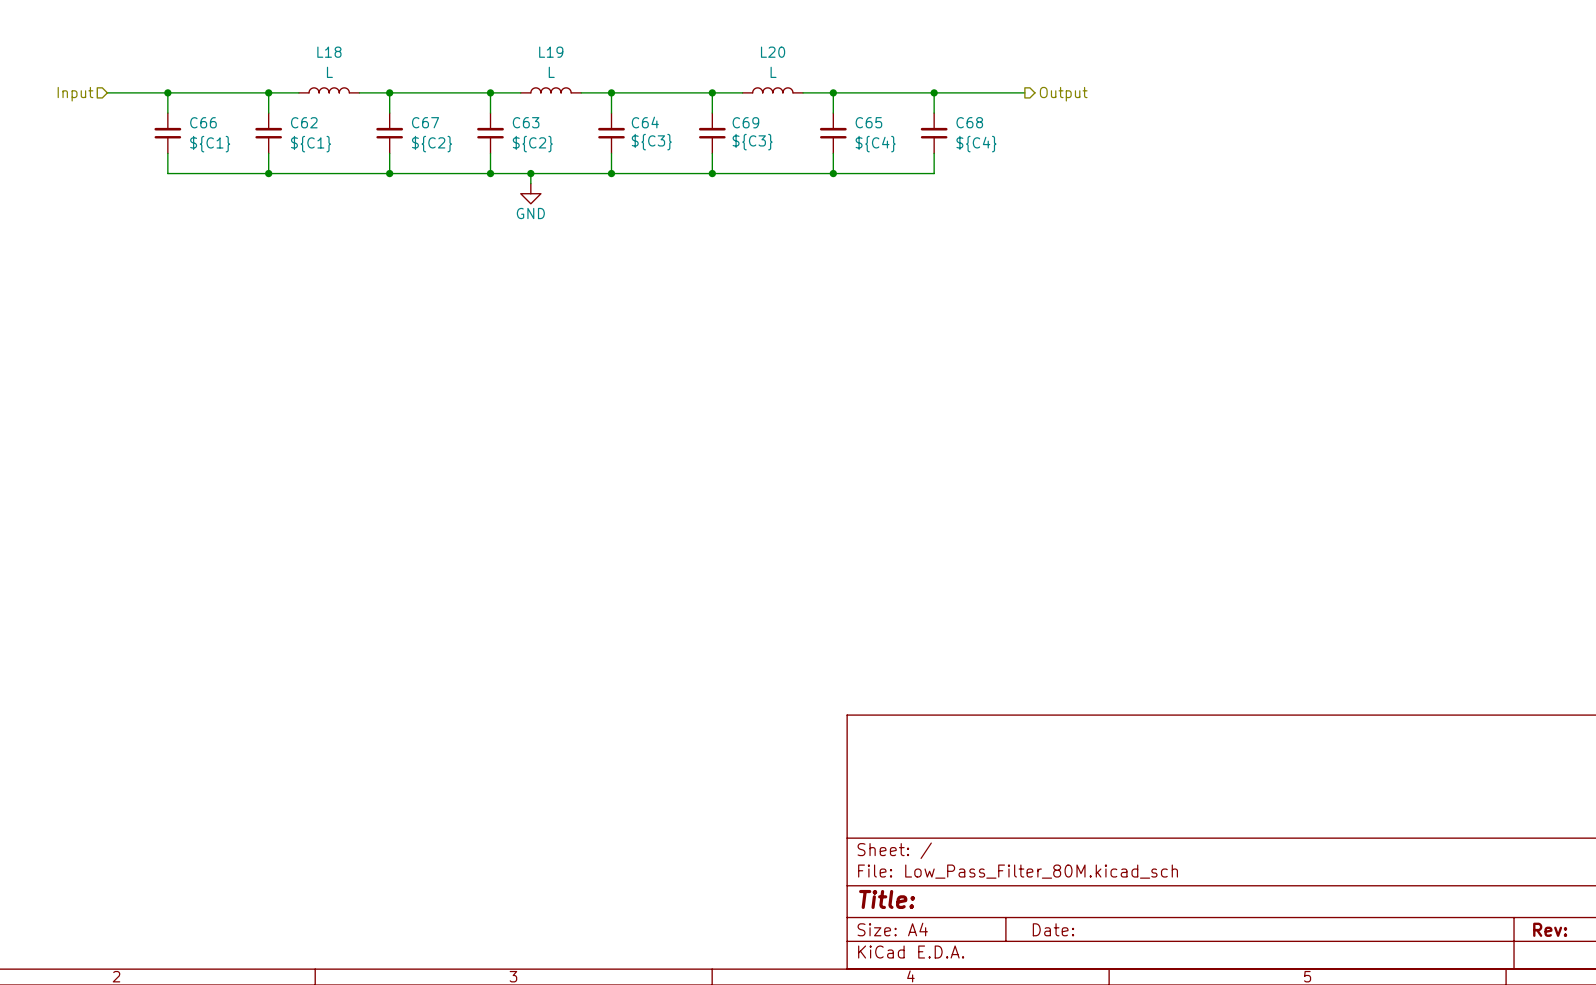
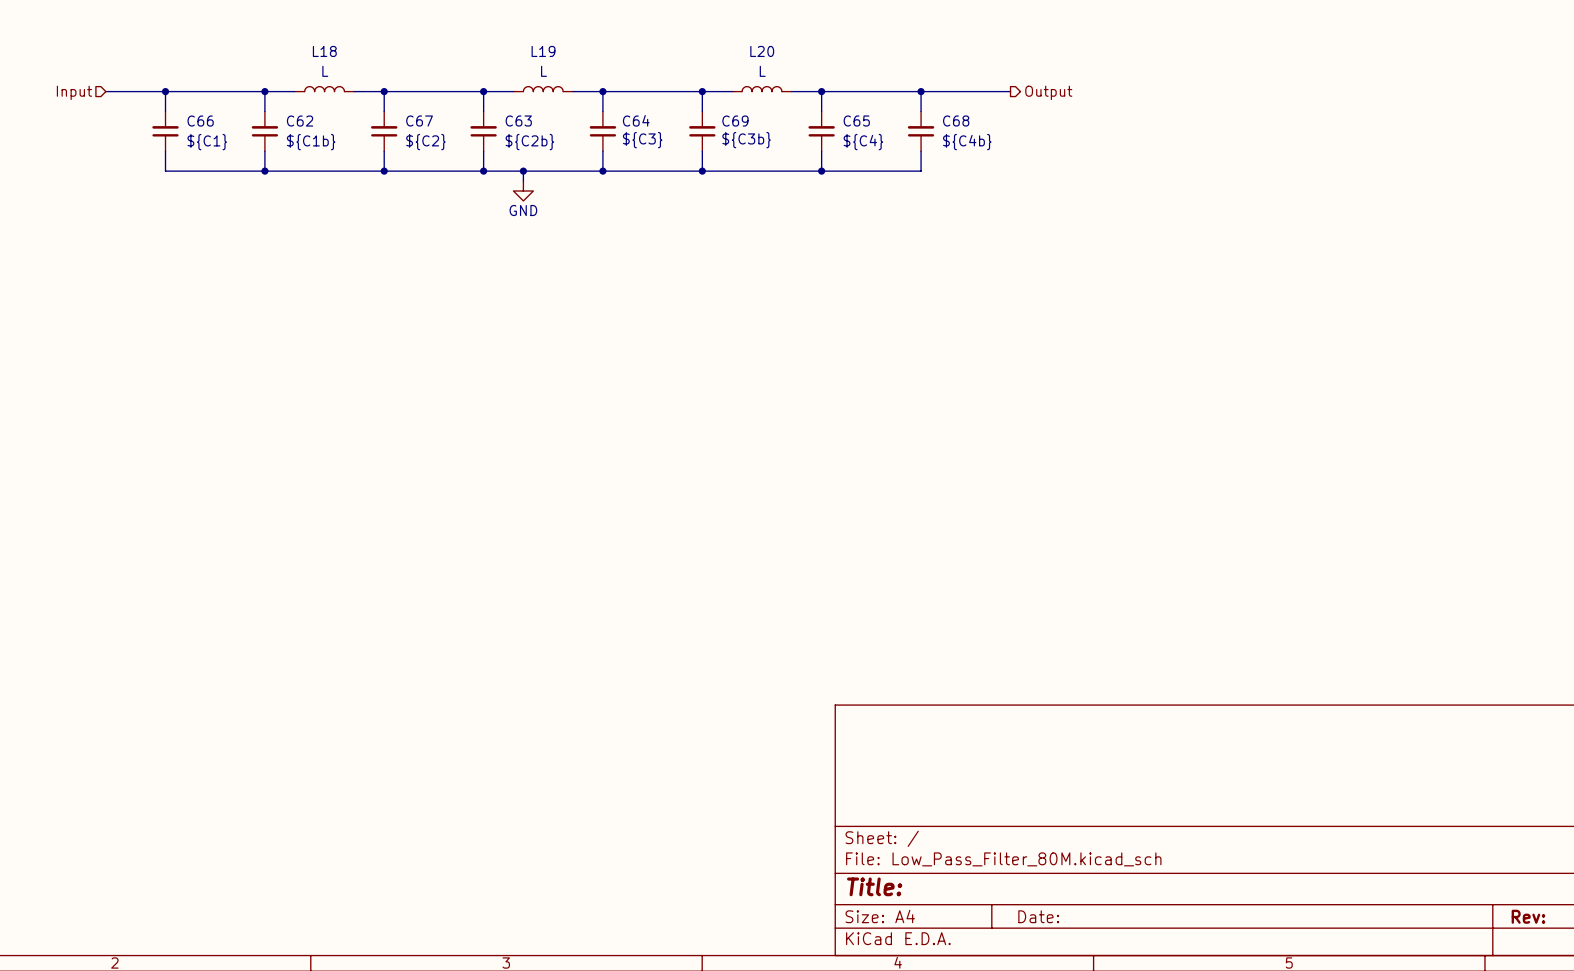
C69 value: ${C3} (752, 142) -> ${C3b} (746, 140)
C62 value: ${C1} (311, 144) -> ${C1b} (311, 142)
C63 value: ${C2} (532, 144) -> ${C2b} (529, 142)
C68 value: ${C4} (976, 144) -> ${C4b} (967, 142)

